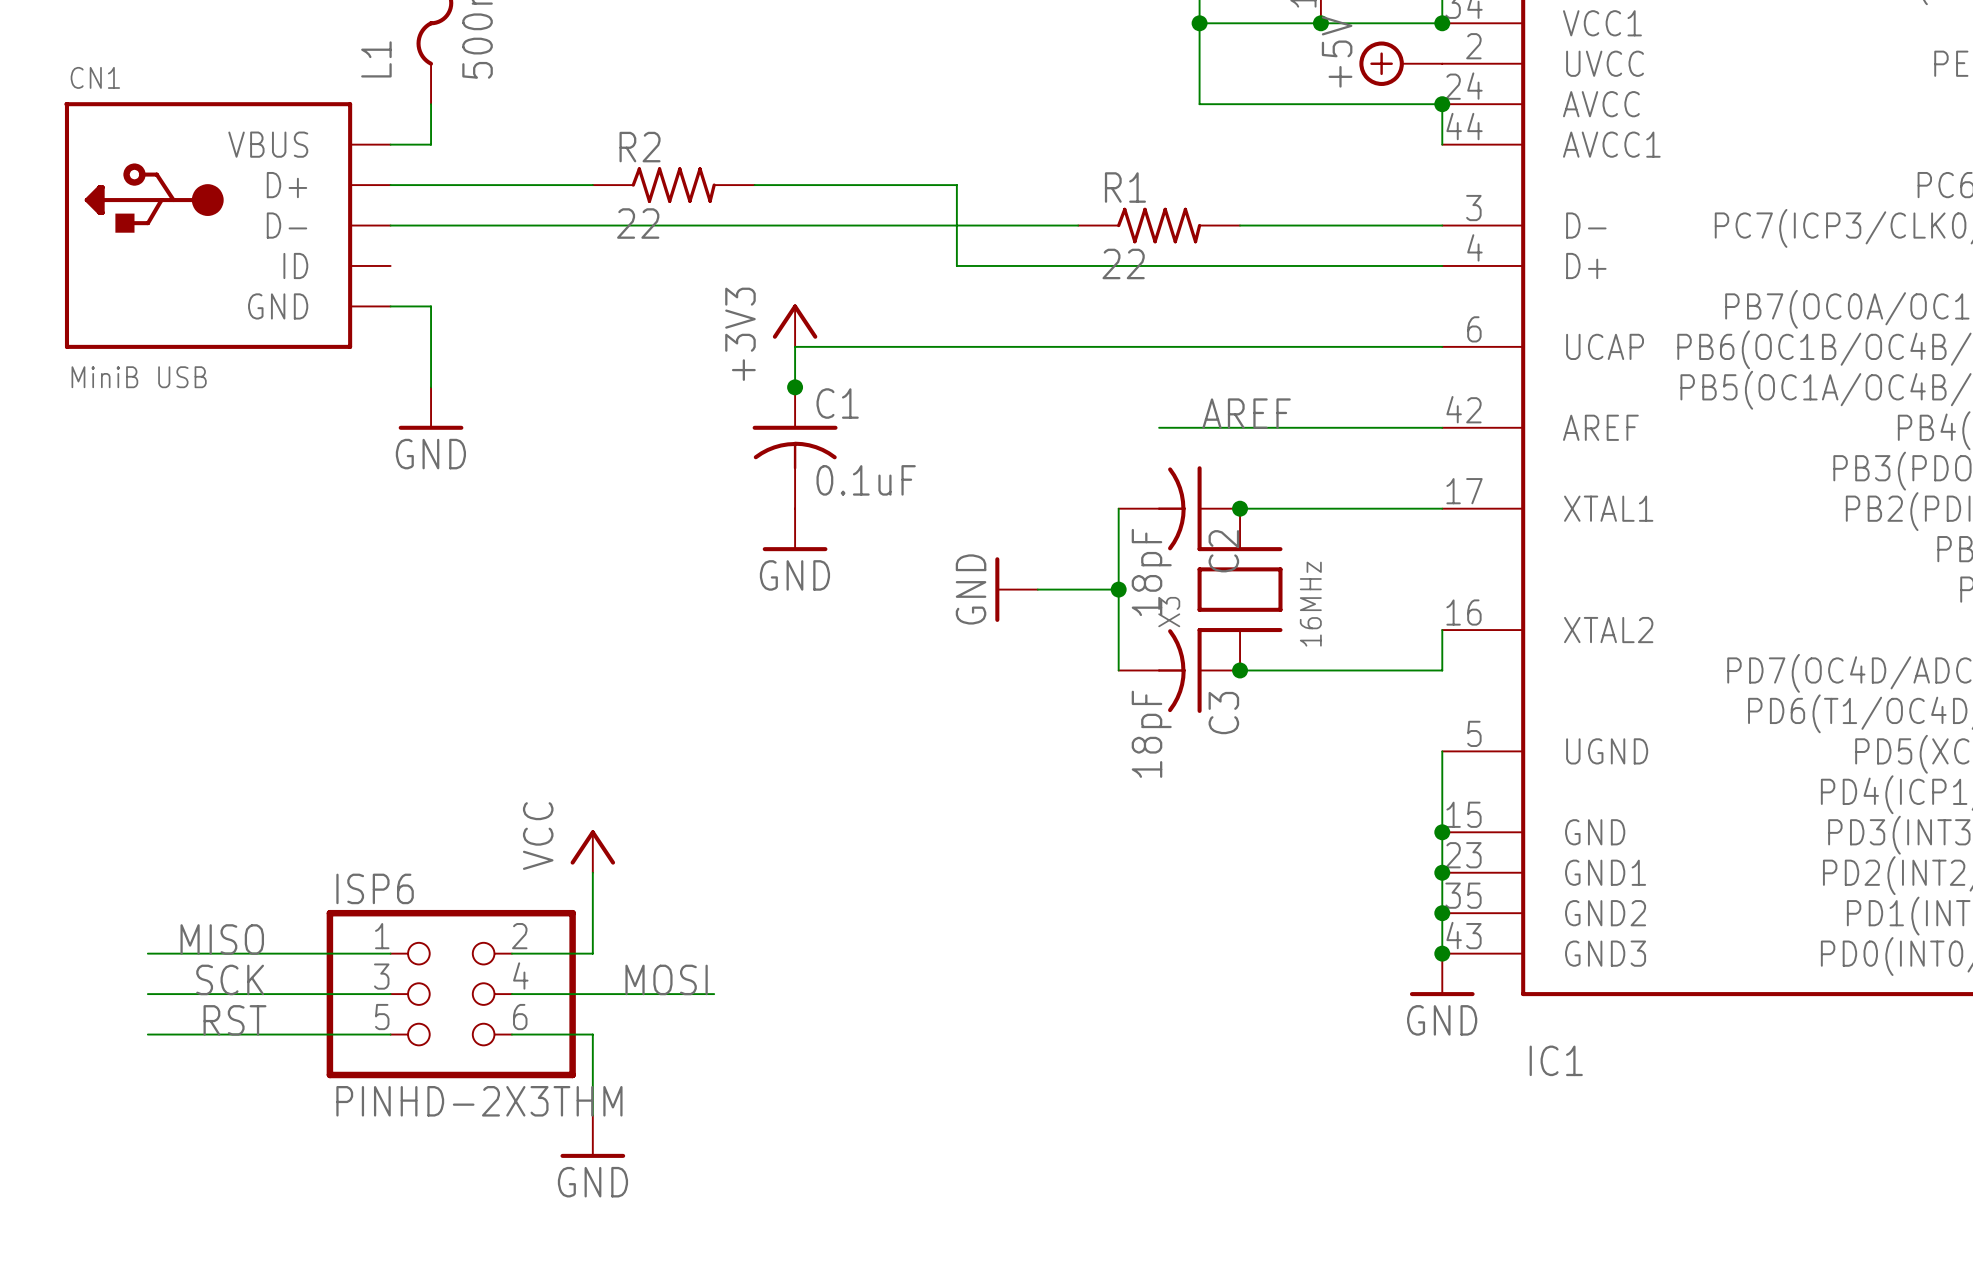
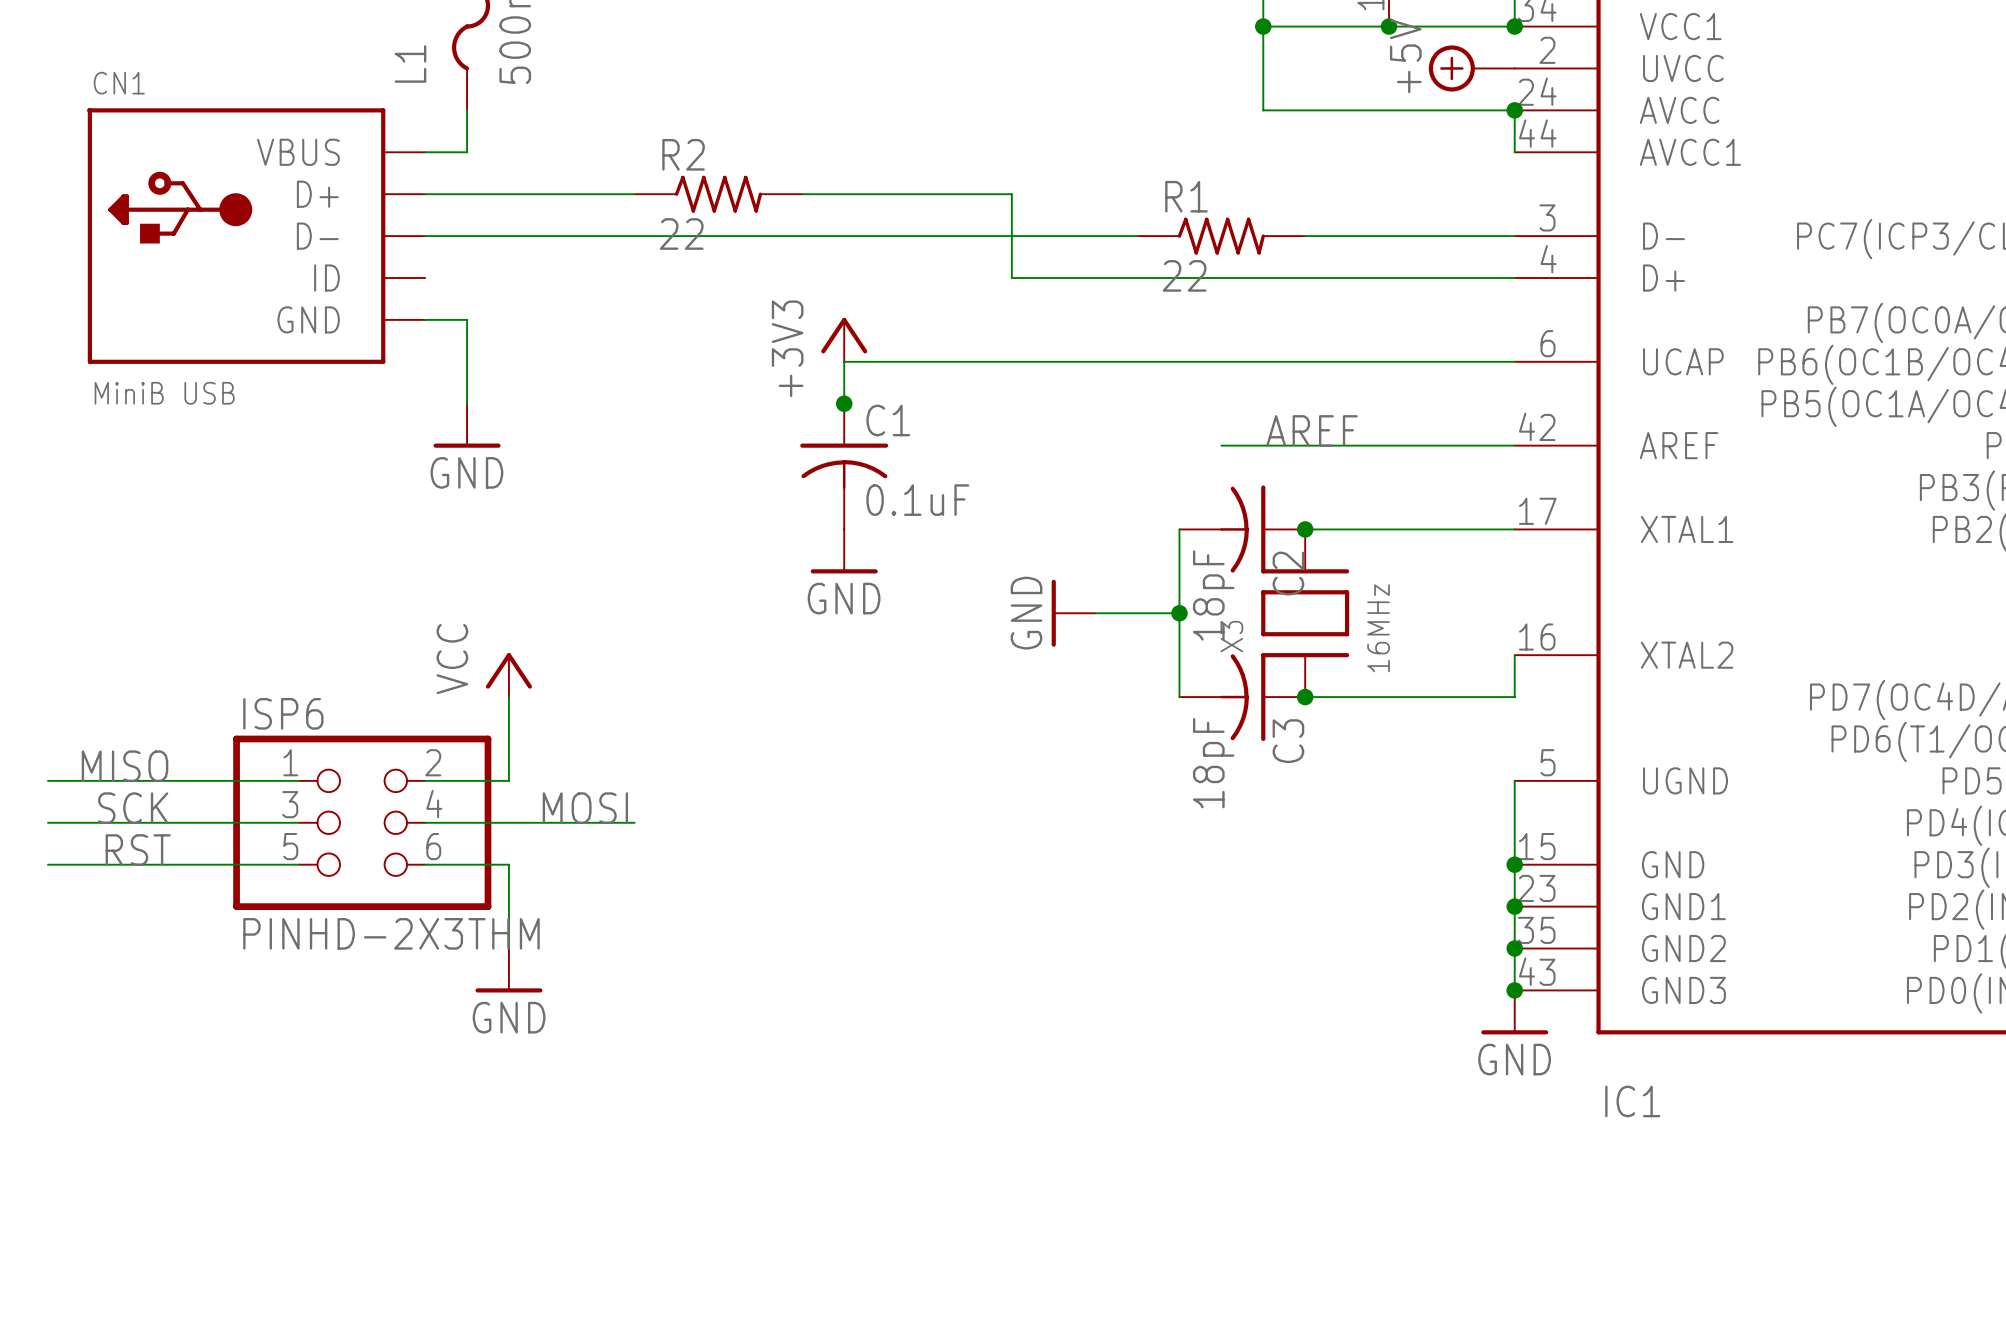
power symbol position: VCC (592, 851) -> VCC (508, 675)
wire: (592, 872) (592, 953) (511, 953) -> (508, 697) (508, 780) (425, 780)
label position: MISO (222, 939) -> MISO (125, 766)
wire: (147, 953) (390, 953) -> (47, 780) (299, 780)
label position: SCK (230, 979) -> SCK (133, 808)
label position: MOSI (666, 979) -> MOSI (585, 808)
wire: (147, 994) (390, 994) -> (47, 822) (299, 822)
ISP6 position: (451, 994) -> (362, 822)
wire: (511, 994) (714, 994) -> (425, 822) (634, 822)
label position: RST (234, 1020) -> RST (138, 850)
wire: (147, 1034) (390, 1034) -> (47, 864) (299, 864)
wire: (511, 1034) (592, 1034) (592, 1115) -> (425, 864) (508, 864) (508, 948)
power symbol position: GND (592, 1136) -> GND (508, 970)

